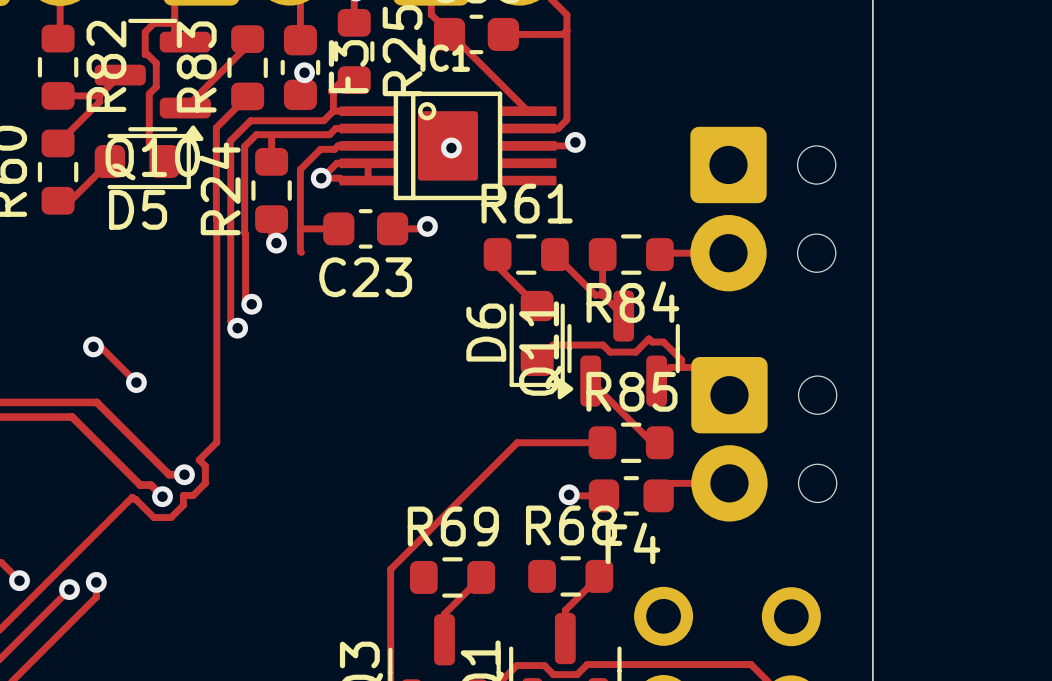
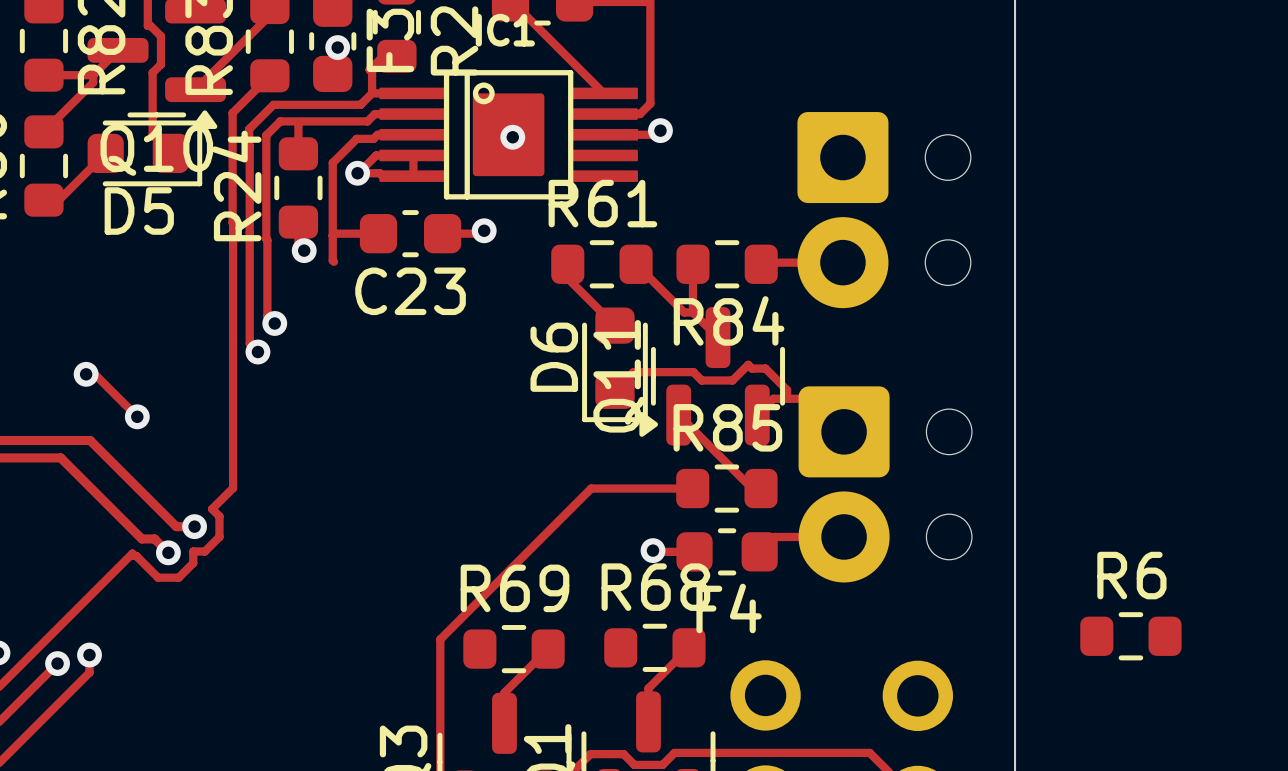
R6: none -> (1130, 636)

